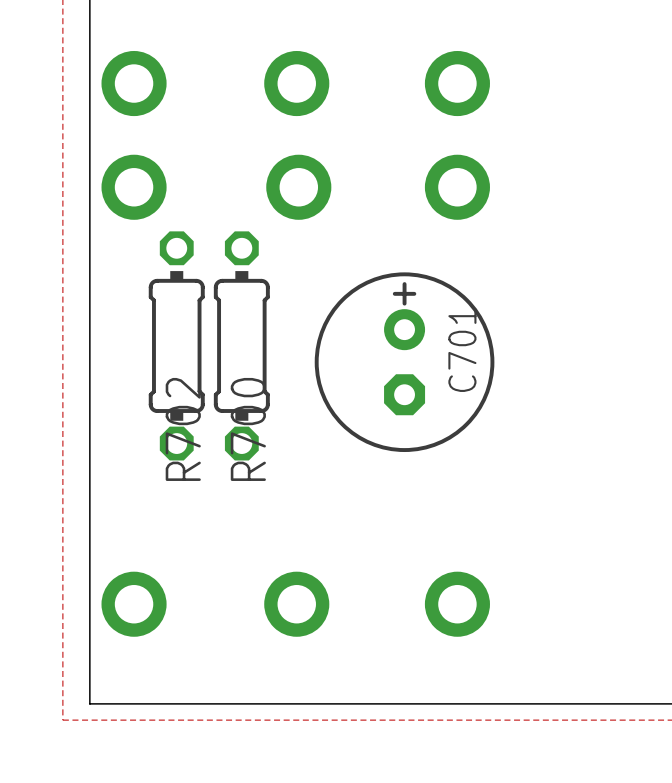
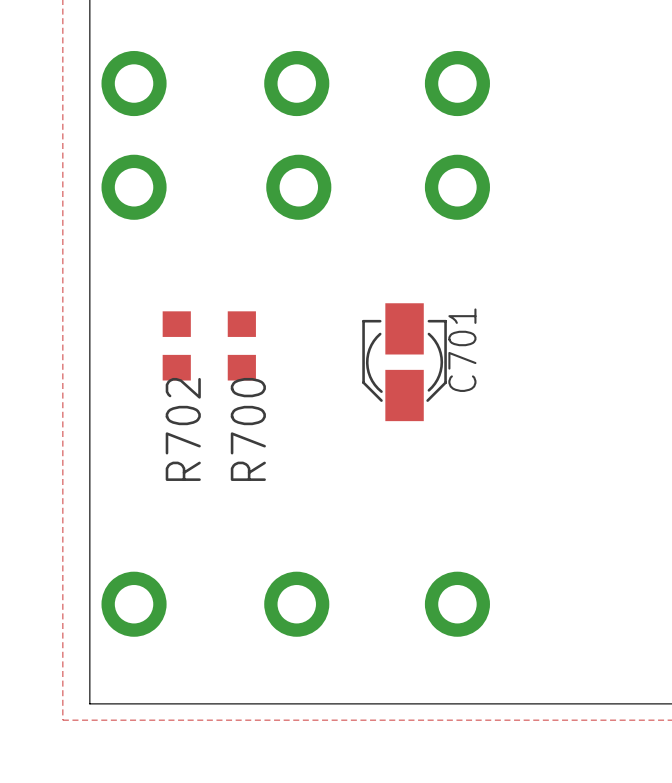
R702 footprint: [148, 231, 205, 461] -> [162, 311, 191, 381]
R700 footprint: [213, 231, 270, 461] -> [227, 311, 256, 381]
C701 footprint: [314, 272, 495, 453] -> [362, 303, 447, 422]

